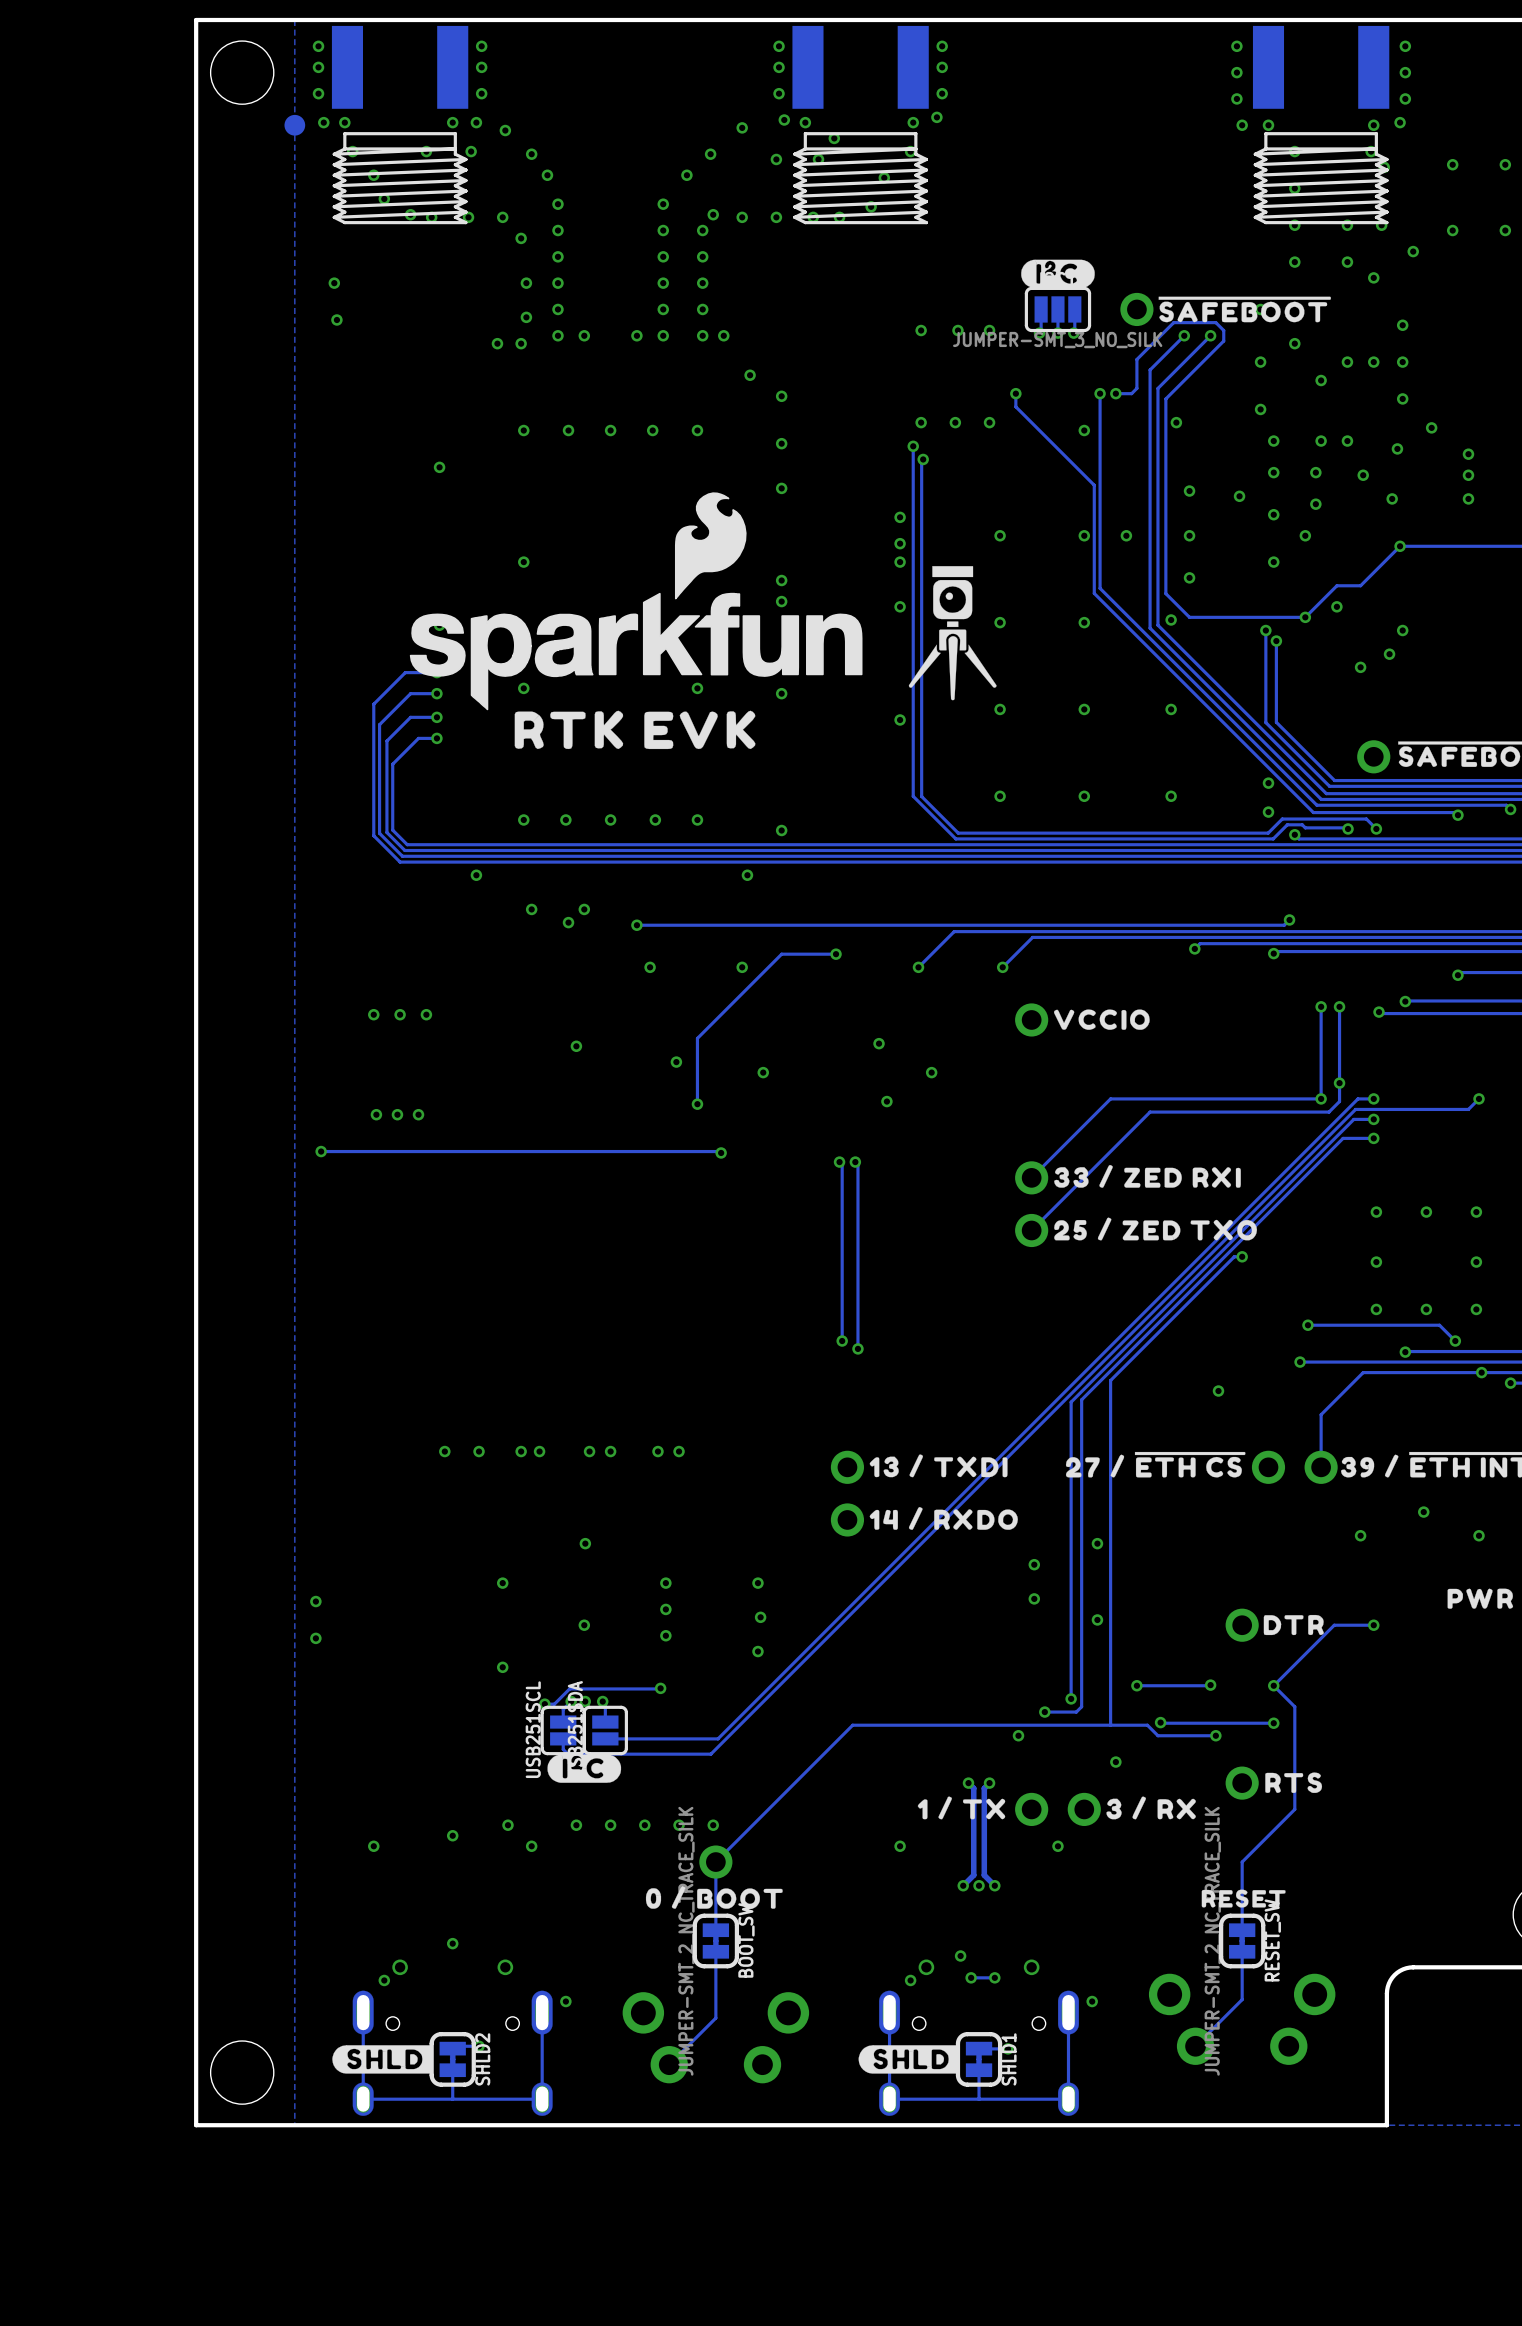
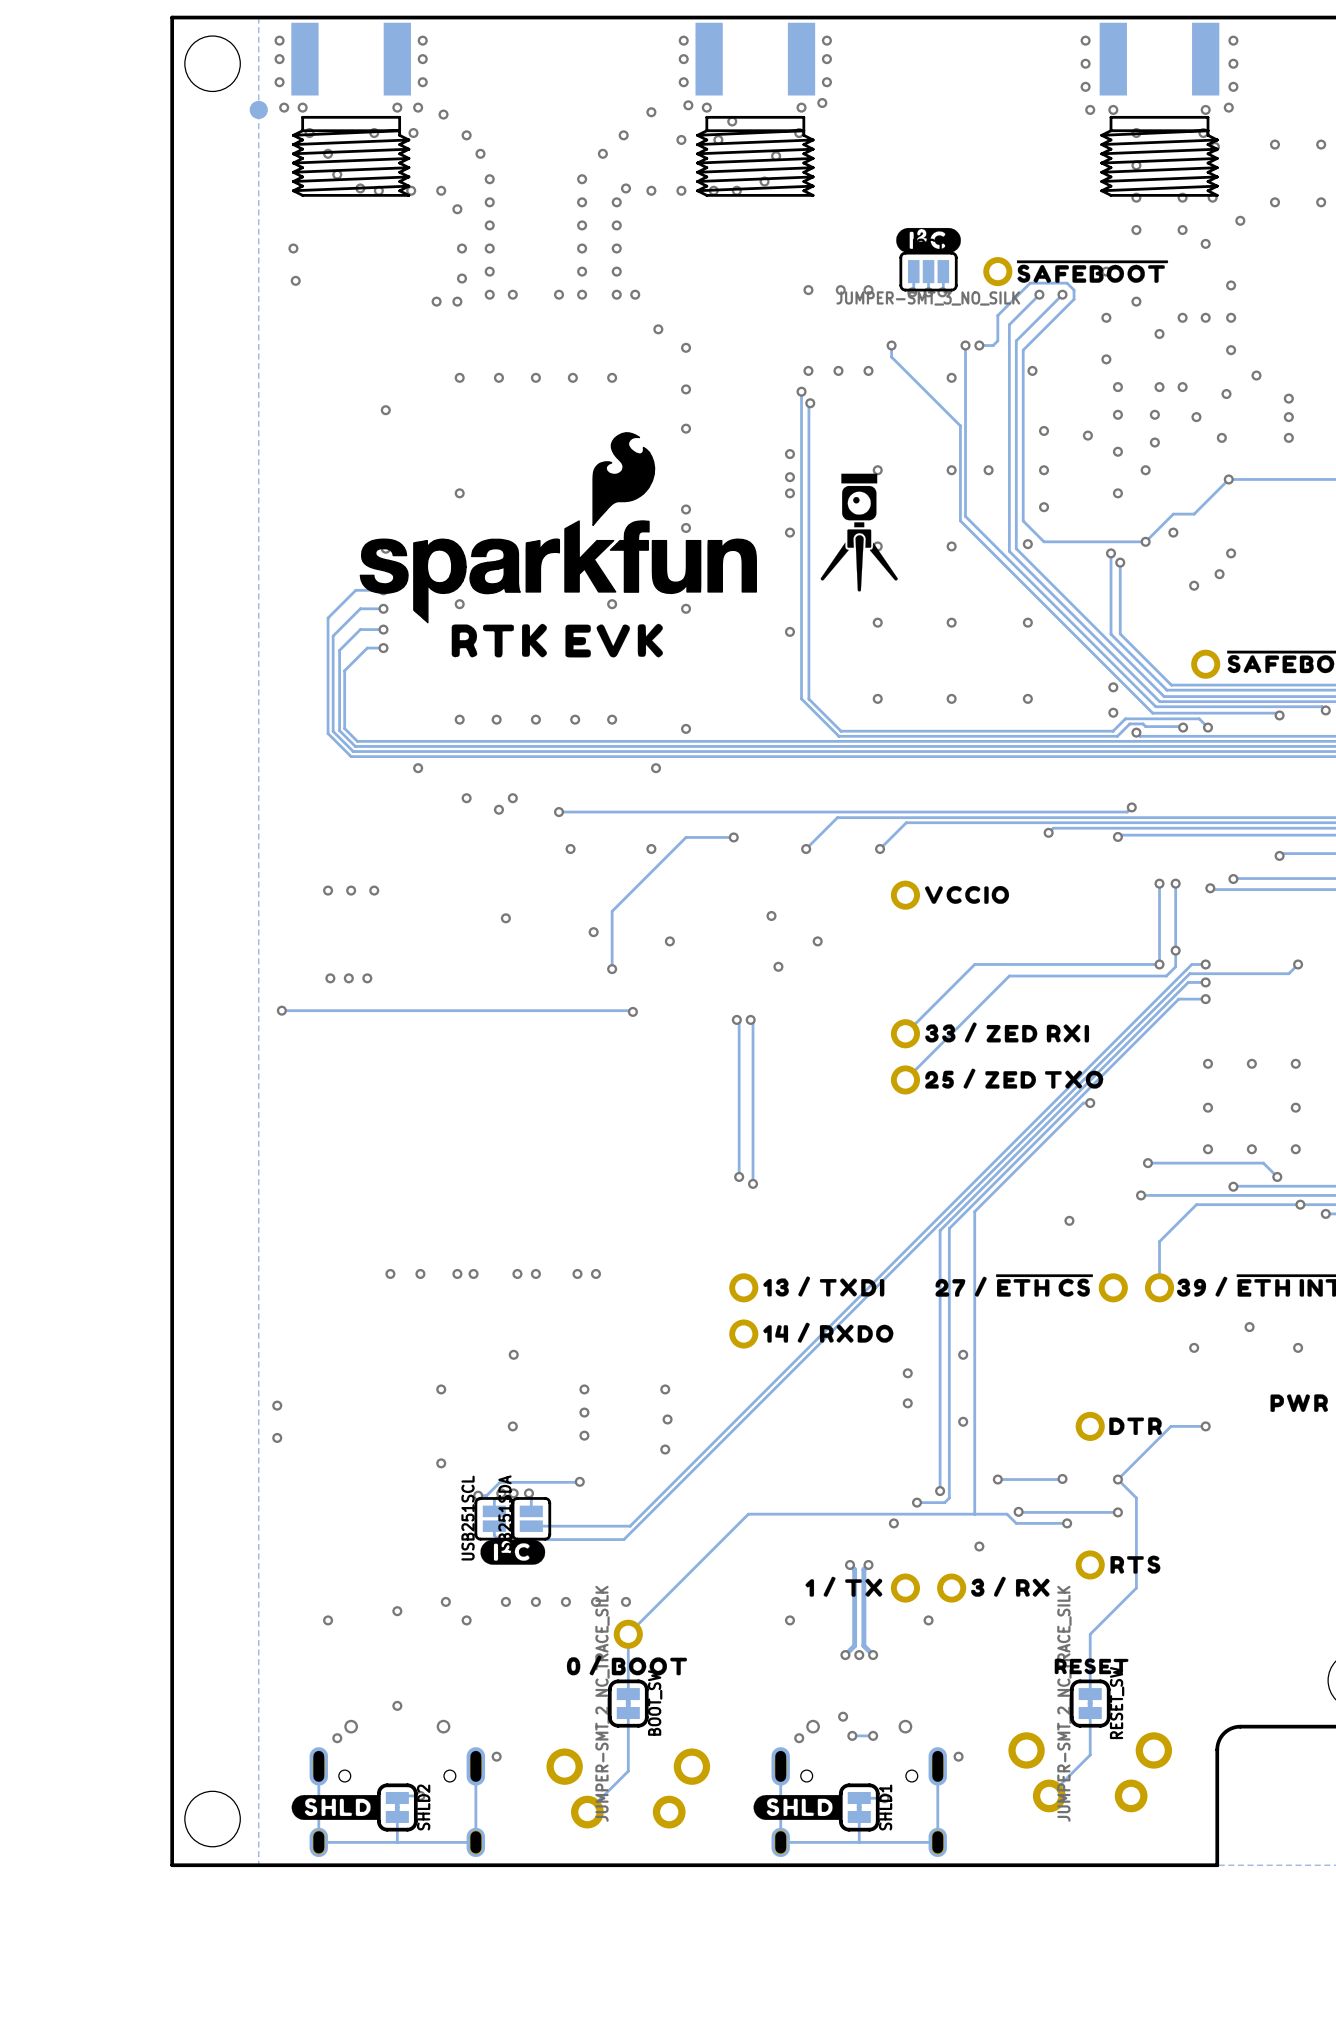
drawing position: (952, 633) -> (859, 532)

